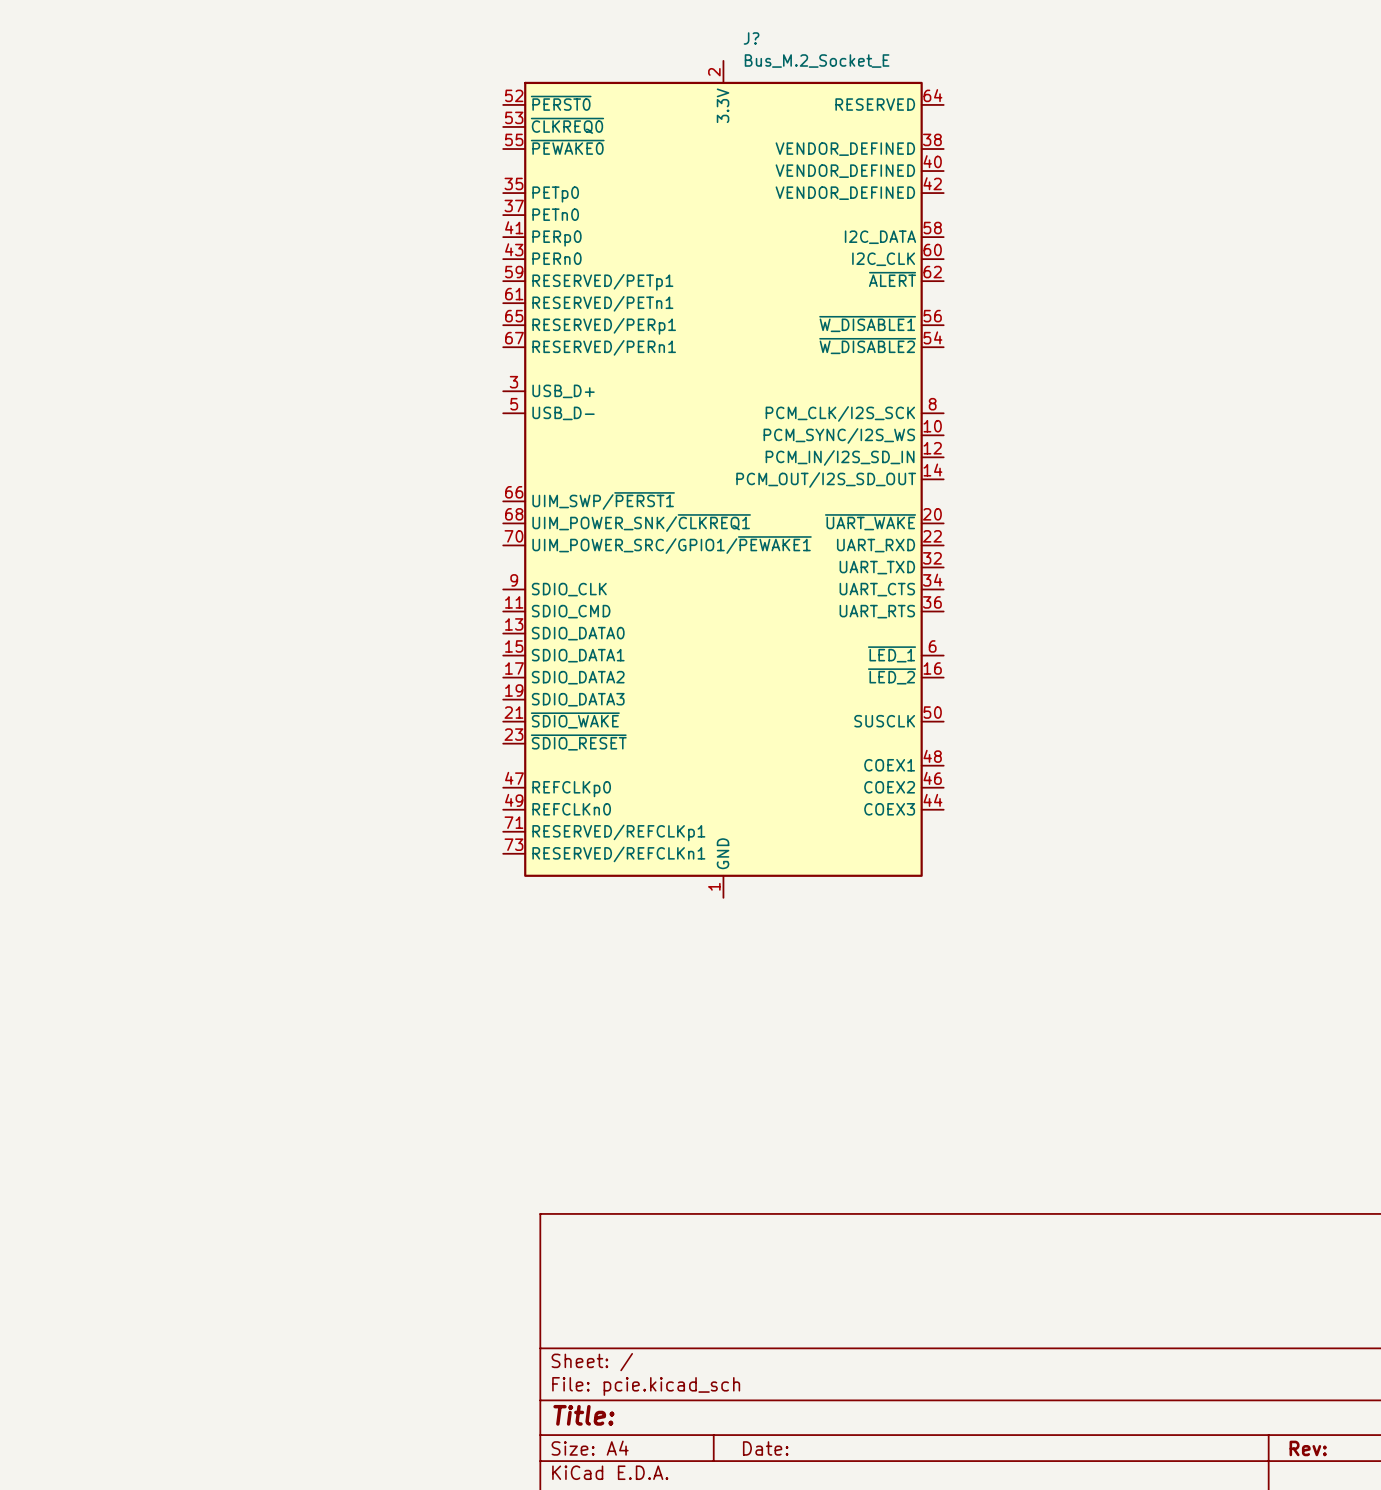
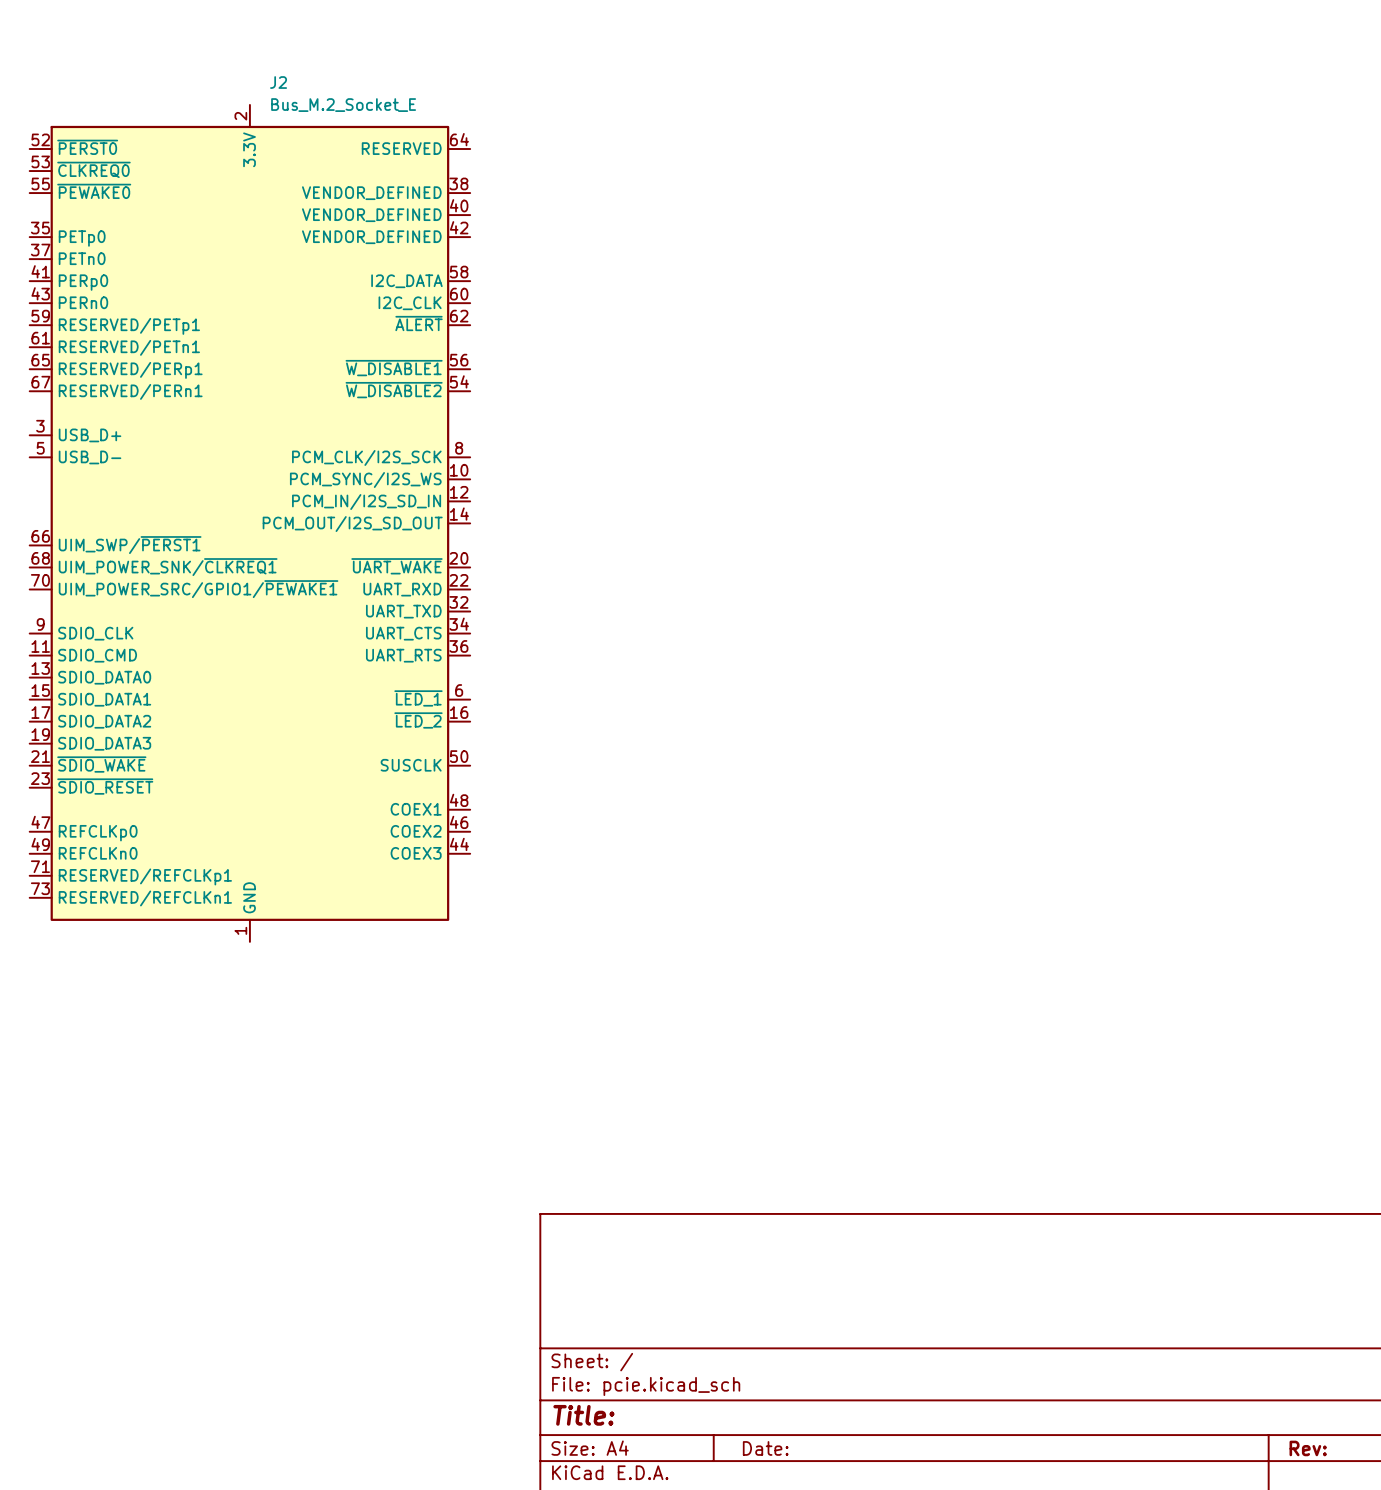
J?: Bus_M.2_Socket_E (723, 479) -> none
J2: none -> Bus_M.2_Socket_E (249, 523)

